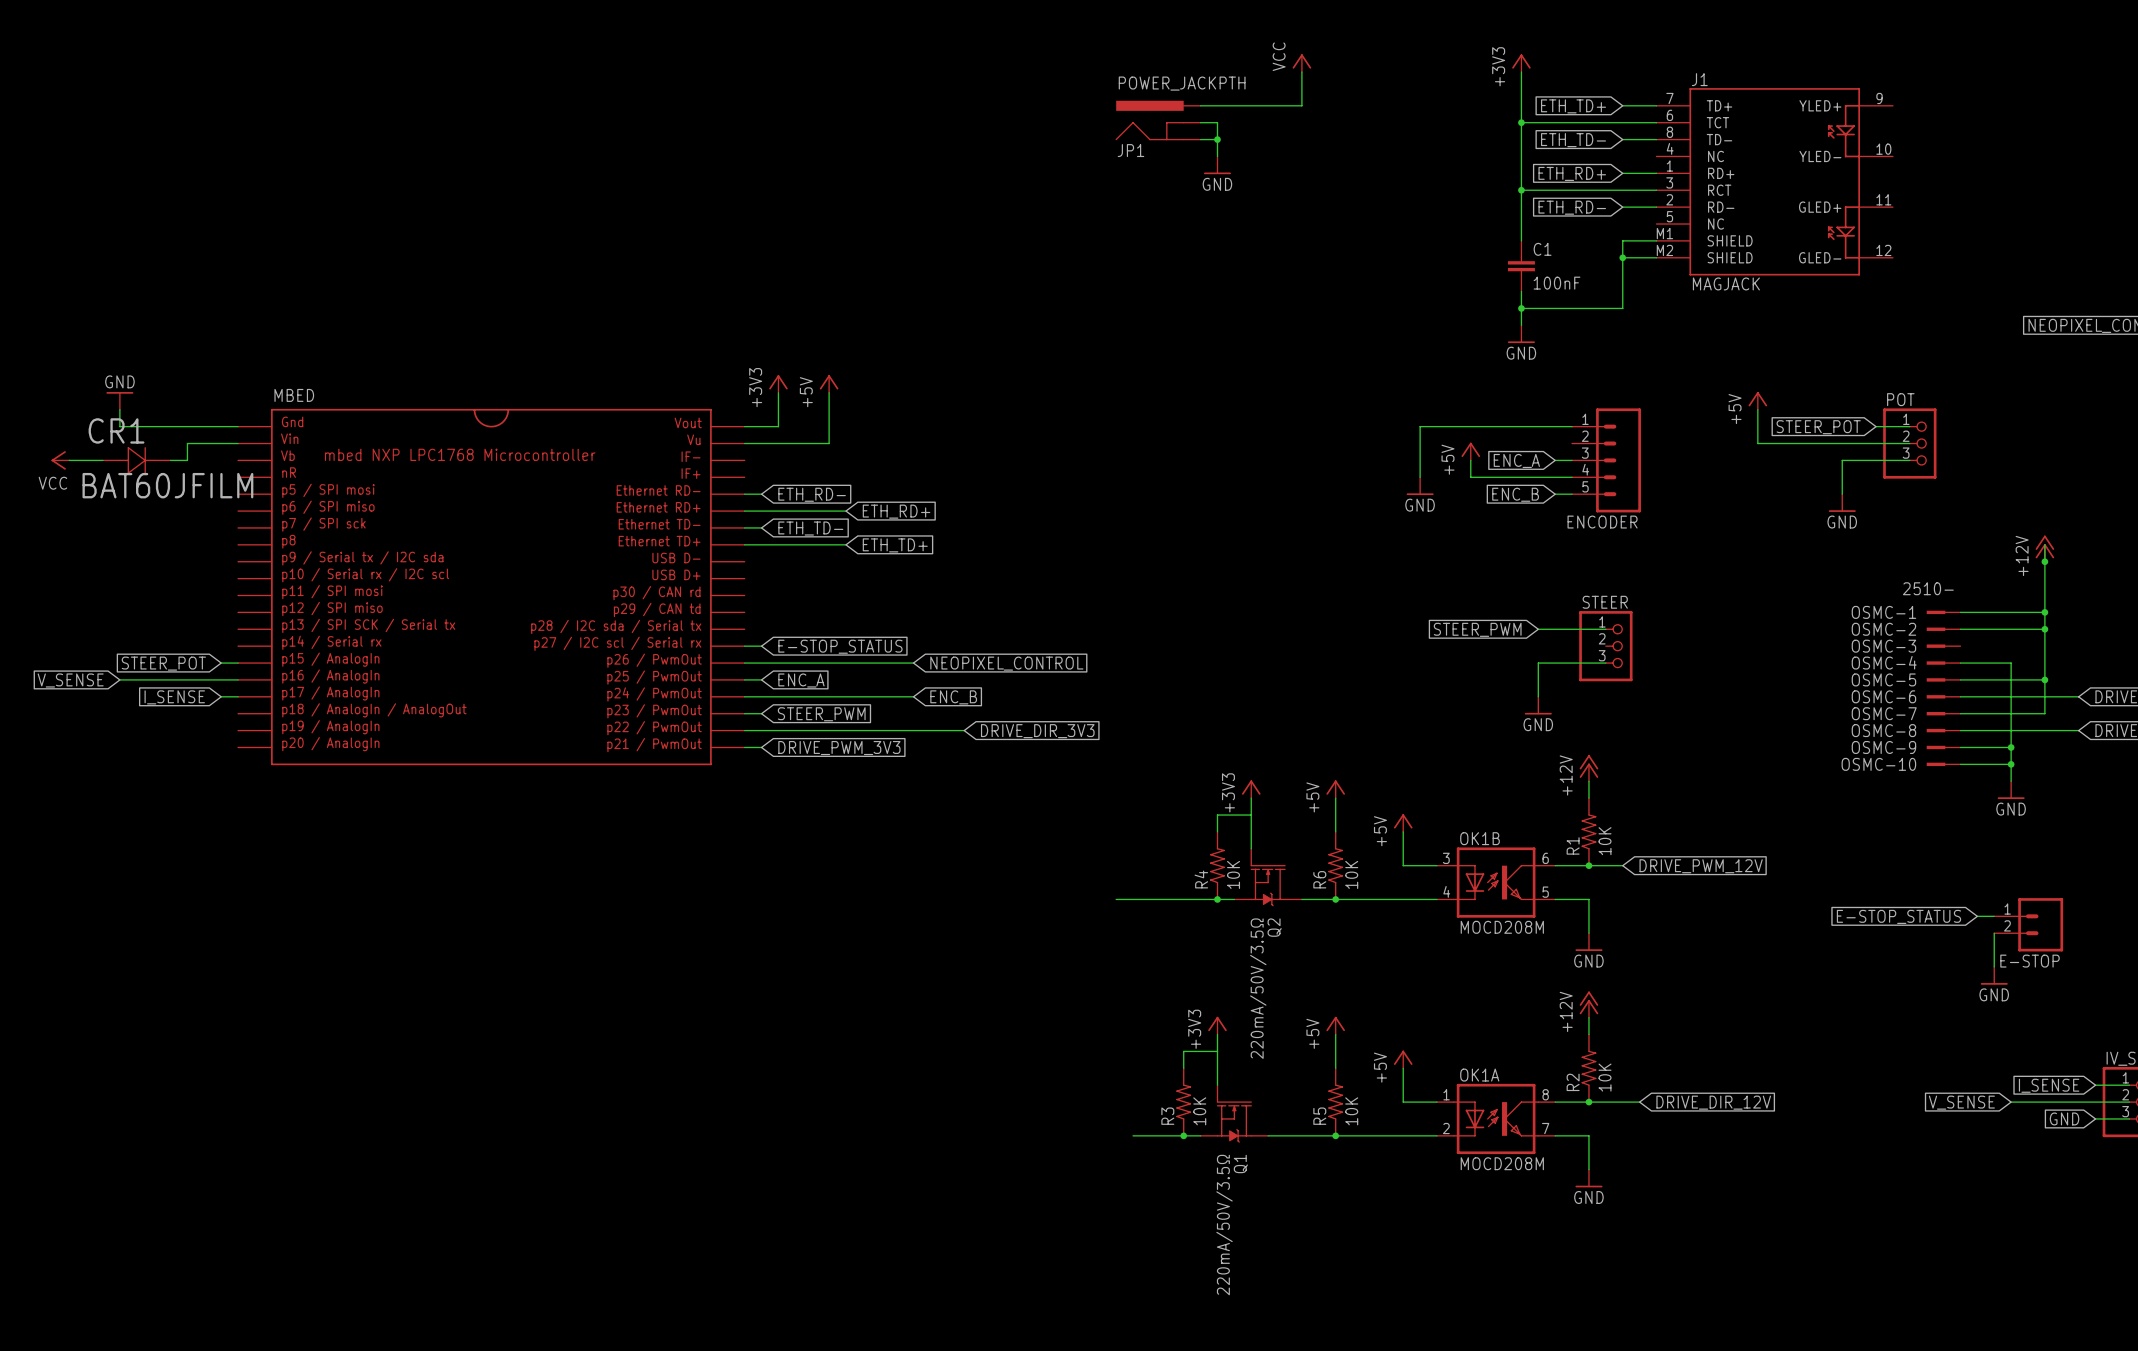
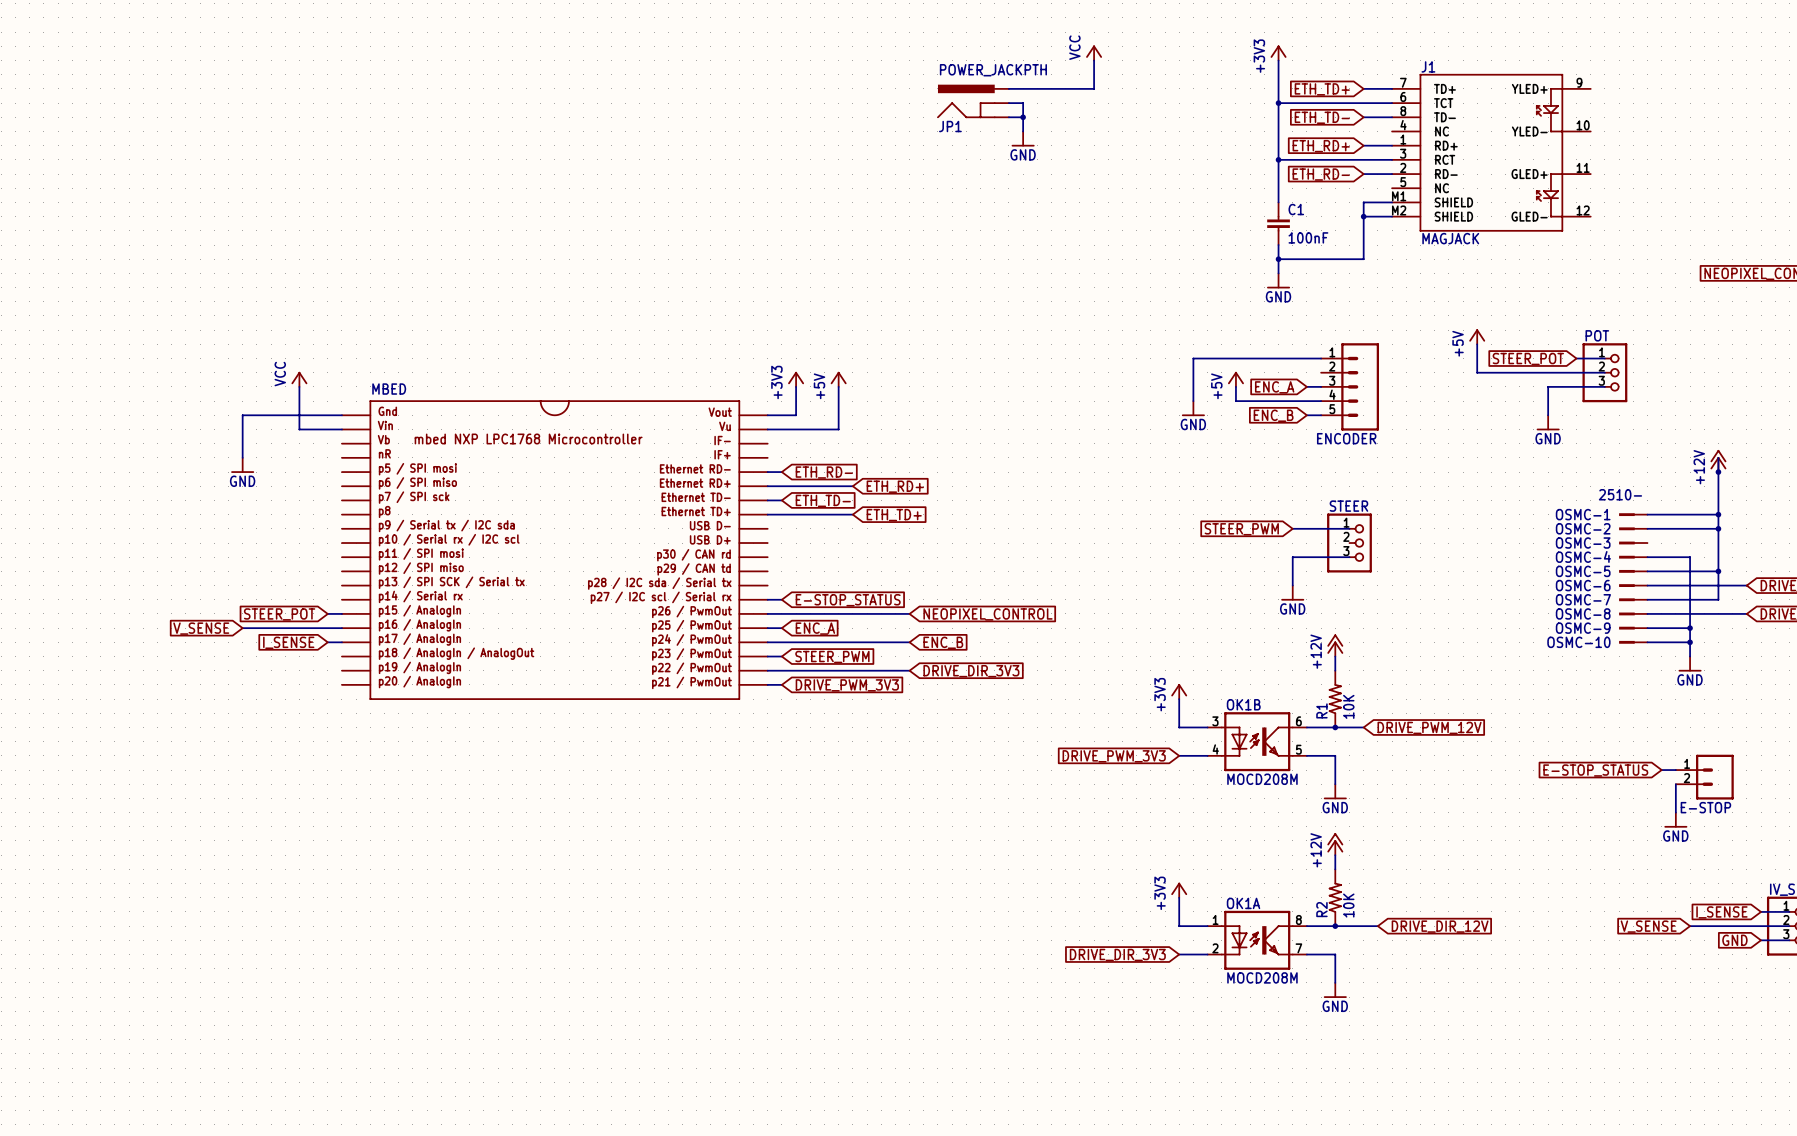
power symbol: +3V3 (778, 384) -> none
power symbol: +5V (829, 384) -> none
wire: (778, 392) (778, 426) (744, 426) -> none
wire: (829, 392) (829, 443) (744, 443) -> none
power symbol: GND (119, 400) -> none
wire: (119, 409) (119, 426) (238, 426) -> none
wire: (238, 443) (187, 443) (187, 460) (170, 460) -> none
power symbol: none -> VCC (299, 379)
power symbol: none -> +3V3 (796, 379)
power symbol: none -> +5V (838, 379)
power symbol: VCC (60, 460) -> none
wire: (69, 460) (103, 460) -> none
CR1: BAT60JFILM (136, 460) -> none
wire: none -> (299, 386) (299, 429) (341, 429)
wire: none -> (796, 386) (796, 415) (767, 415)
wire: none -> (838, 386) (838, 429) (767, 429)
wire: none -> (341, 415) (242, 415) (242, 457)
wire: (744, 494) (761, 494) -> none
global label: ETH_RD- (812, 494) -> none
wire: (744, 511) (845, 511) -> none
global label: ETH_RD+ (896, 511) -> none
wire: (744, 527) (761, 527) -> none
global label: ETH_TD- (810, 528) -> none
wire: (744, 544) (845, 544) -> none
global label: ETH_TD+ (895, 545) -> ETH_RD- (824, 472)
power symbol: none -> GND (242, 465)
wire: none -> (767, 472) (781, 472)
wire: none -> (767, 486) (852, 486)
global label: none -> ETH_RD+ (895, 486)
MBED: (491, 587) -> none
wire: none -> (767, 500) (781, 500)
global label: none -> ETH_TD- (823, 500)
wire: none -> (767, 514) (852, 514)
global label: none -> ETH_TD+ (894, 515)
wire: (744, 646) (761, 646) -> none
global label: E-STOP_STATUS (840, 646) -> none
MBED: none -> (554, 550)
global label: STEER_POT (163, 663) -> none
wire: (221, 663) (238, 663) -> none
wire: (744, 663) (913, 663) -> none
global label: NEOPIXEL_CONTROL (1006, 663) -> none
wire: (119, 679) (238, 679) -> none
wire: (744, 679) (761, 679) -> none
global label: V_SENSE (70, 680) -> none
global label: ENC_A (801, 680) -> none
wire: (221, 696) (238, 696) -> none
wire: (744, 696) (913, 696) -> none
global label: I_SENSE (174, 697) -> none
global label: ENC_B (953, 697) -> none
wire: (744, 713) (761, 713) -> none
wire: none -> (767, 599) (781, 599)
global label: STEER_PWM (821, 714) -> none
global label: none -> E-STOP_STATUS (848, 600)
wire: none -> (327, 613) (341, 613)
wire: (744, 730) (913, 730) -> none
wire: none -> (810, 613) (909, 613)
global label: none -> STEER_POT (279, 614)
global label position: DRIVE_DIR_3V3 (1037, 731) -> DRIVE_DIR_3V3 (971, 671)
global label: none -> NEOPIXEL_CONTROL (988, 614)
wire: none -> (242, 628) (341, 628)
wire: (744, 747) (761, 747) -> none
wire: none -> (767, 628) (781, 628)
global label: none -> V_SENSE (201, 628)
global label: DRIVE_PWM_3V3 (839, 748) -> none
global label: none -> ENC_A (815, 628)
global label: none -> I_SENSE (288, 642)
wire: none -> (767, 642) (909, 642)
global label: none -> ENC_B (943, 642)
wire: none -> (767, 656) (781, 656)
global label: none -> STEER_PWM (832, 656)
power symbol: +3V3 (1251, 789) -> none
power symbol: +5V (1335, 789) -> none
wire: none -> (767, 670) (909, 670)
wire: (1251, 798) (1251, 848) -> none
wire: (1335, 798) (1335, 831) -> none
wire: none -> (767, 684) (781, 684)
global label: none -> DRIVE_PWM_3V3 (847, 685)
wire: (1251, 815) (1217, 815) (1217, 831) -> none
power symbol: +5V (1403, 823) -> +3V3 (1179, 691)
R4: 10K (1217, 865) -> none
R6: 10K (1335, 865) -> none
Q2: 220mA/50V/3.5Ω (1268, 877) -> none
wire: (1116, 899) (1234, 899) -> none
junction: (1217, 899) -> none
wire: (1301, 899) (1403, 899) -> none
junction: (1335, 899) -> none
global label: none -> DRIVE_PWM_3V3 (1114, 756)
power symbol: +3V3 (1217, 1025) -> none
power symbol: +5V (1335, 1025) -> none
wire: (1217, 1034) (1217, 1085) -> none
wire: (1335, 1034) (1335, 1068) -> none
wire: (1217, 1051) (1183, 1051) (1183, 1068) -> none
power symbol: +5V (1403, 1059) -> +3V3 (1179, 890)
R3: 10K (1183, 1102) -> none
R5: 10K (1335, 1102) -> none
Q1: 220mA/50V/3.5Ω (1234, 1113) -> none
wire: (1133, 1135) (1200, 1135) -> none
junction: (1183, 1135) -> none
wire: (1268, 1135) (1403, 1135) -> none
junction: (1335, 1135) -> none
global label: none -> DRIVE_DIR_3V3 (1117, 954)

